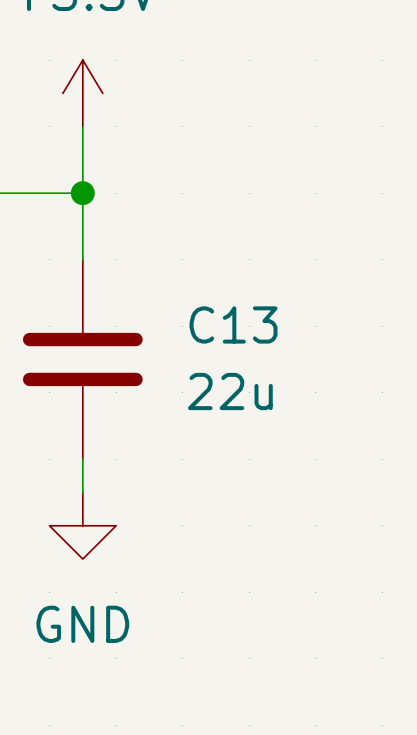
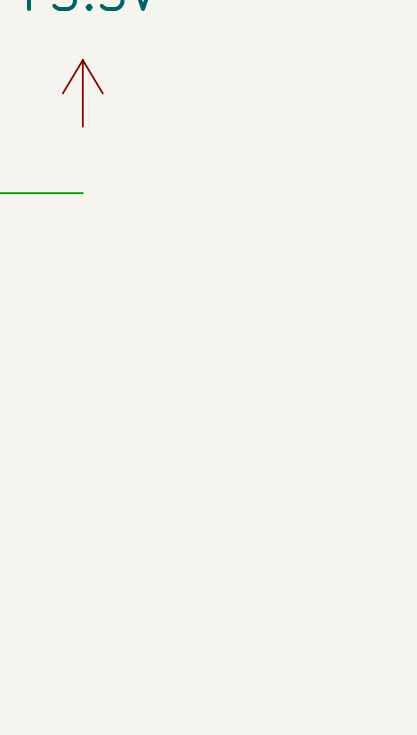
wire: (82, 126) (82, 259) -> none
junction: (82, 193) -> none
C13: 22u (82, 359) -> none
wire: (82, 459) (82, 492) -> none
power symbol: GND (82, 525) -> none

